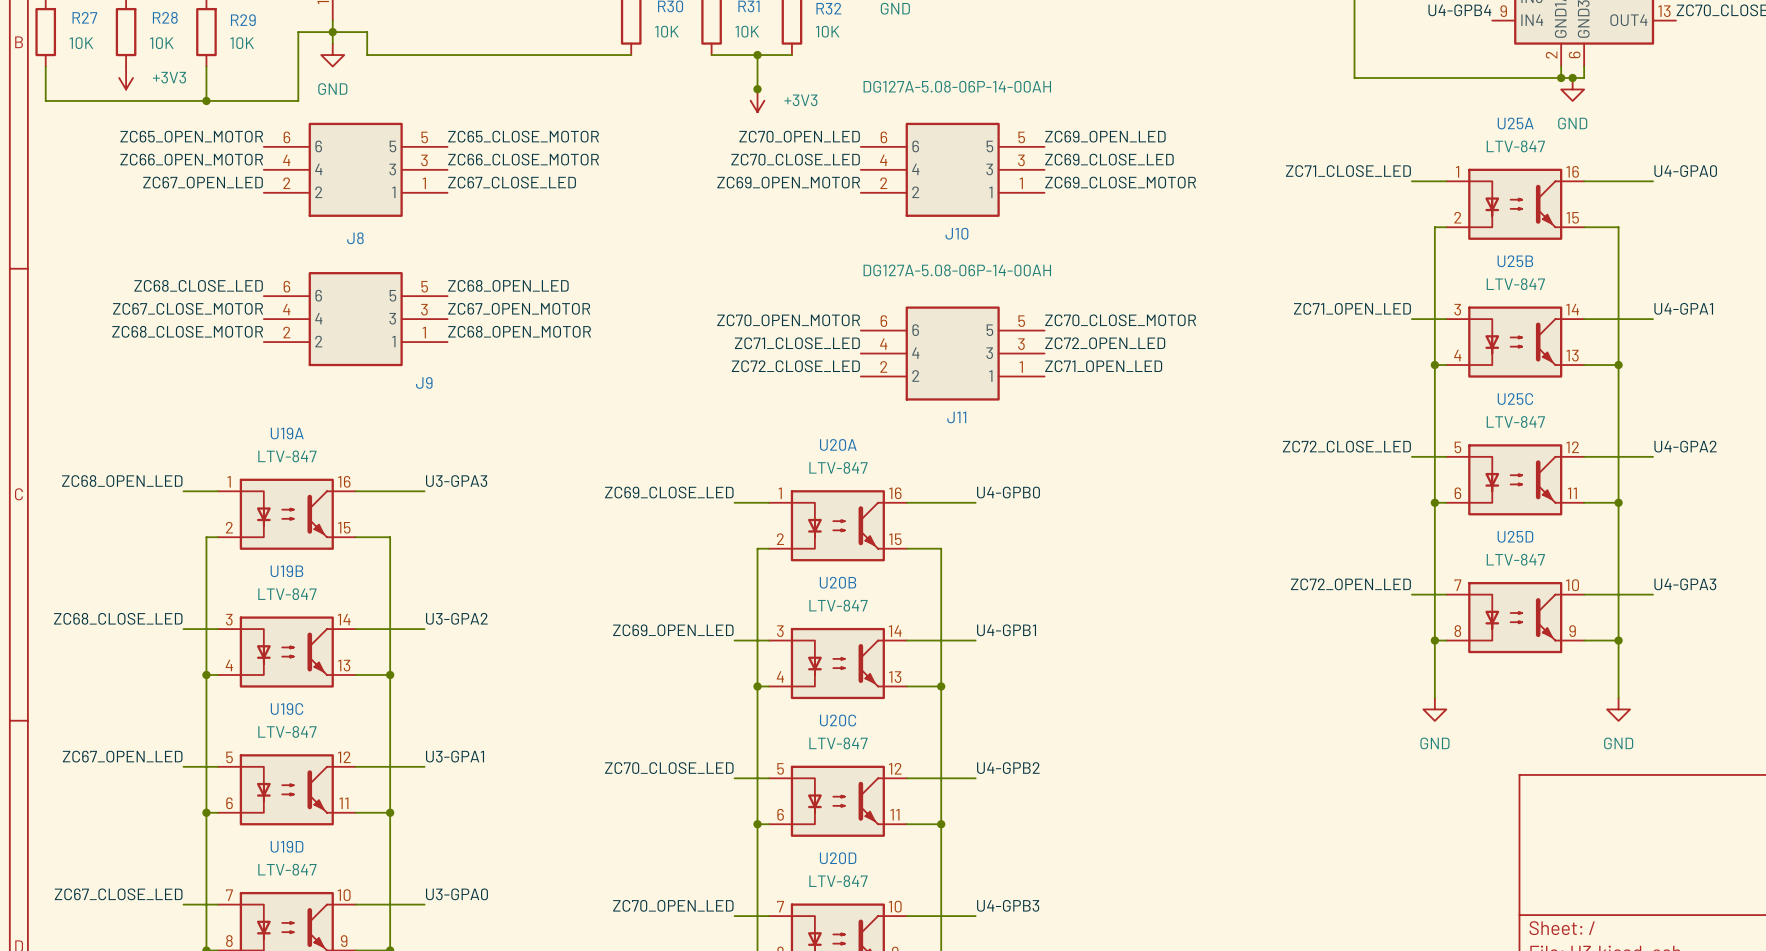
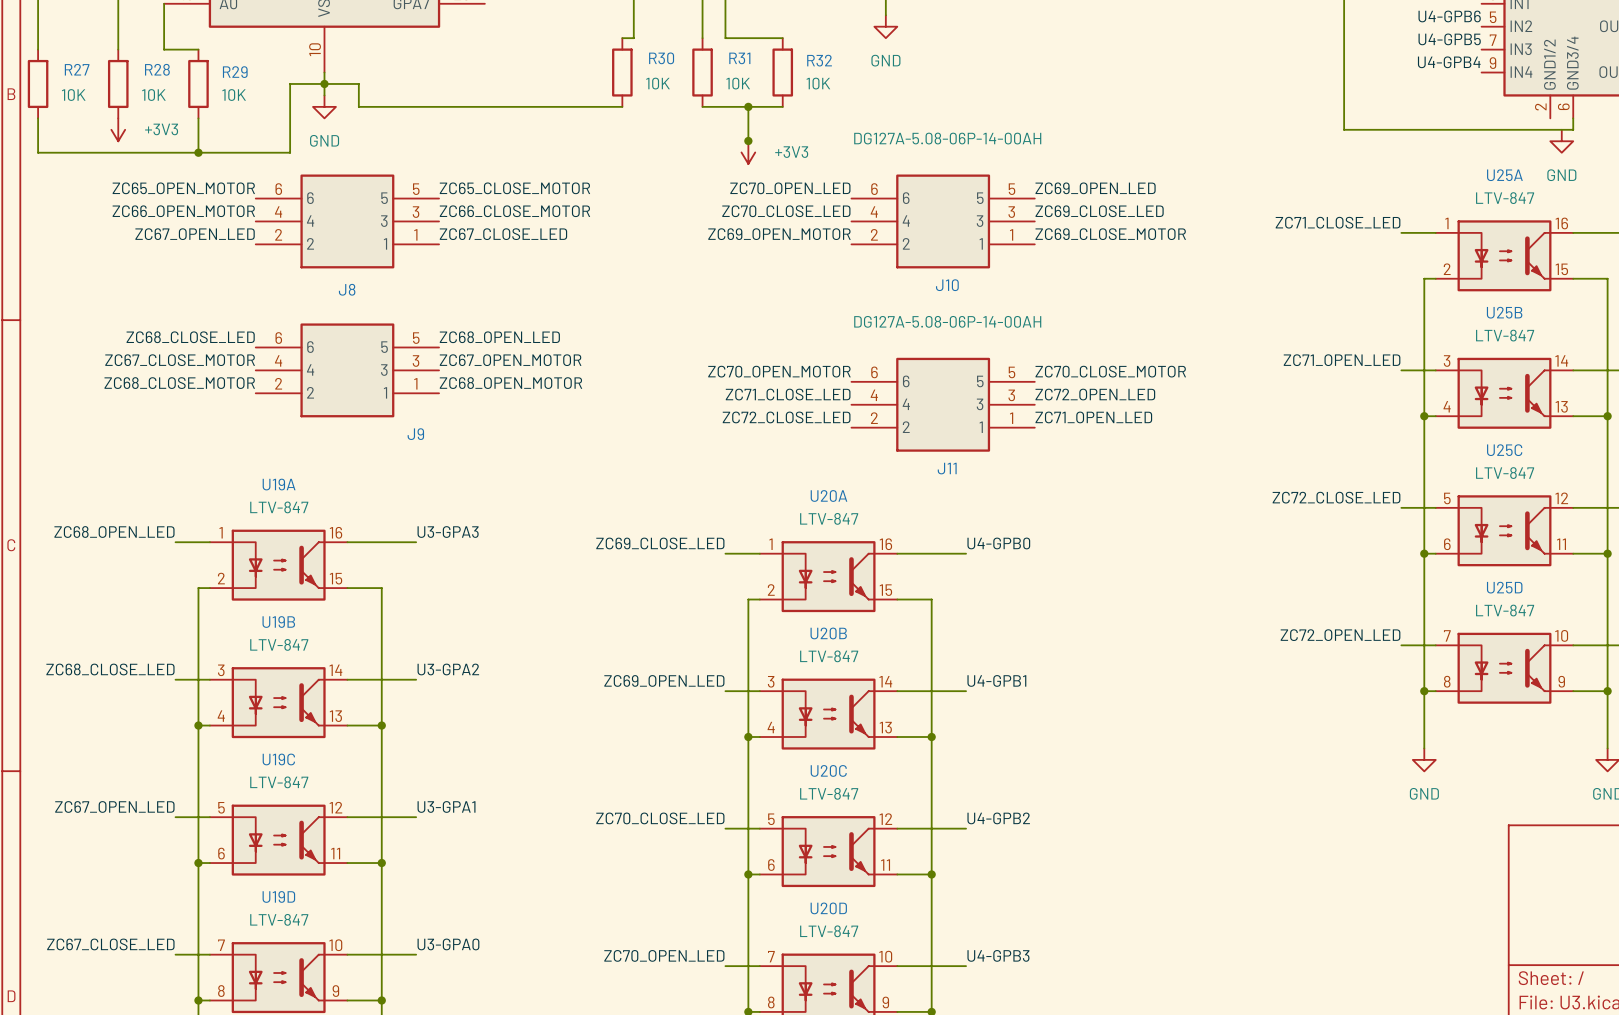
wire: (1561, 66) (1561, 78) -> none
junction: (1561, 78) -> none
junction: (1572, 78) -> none

